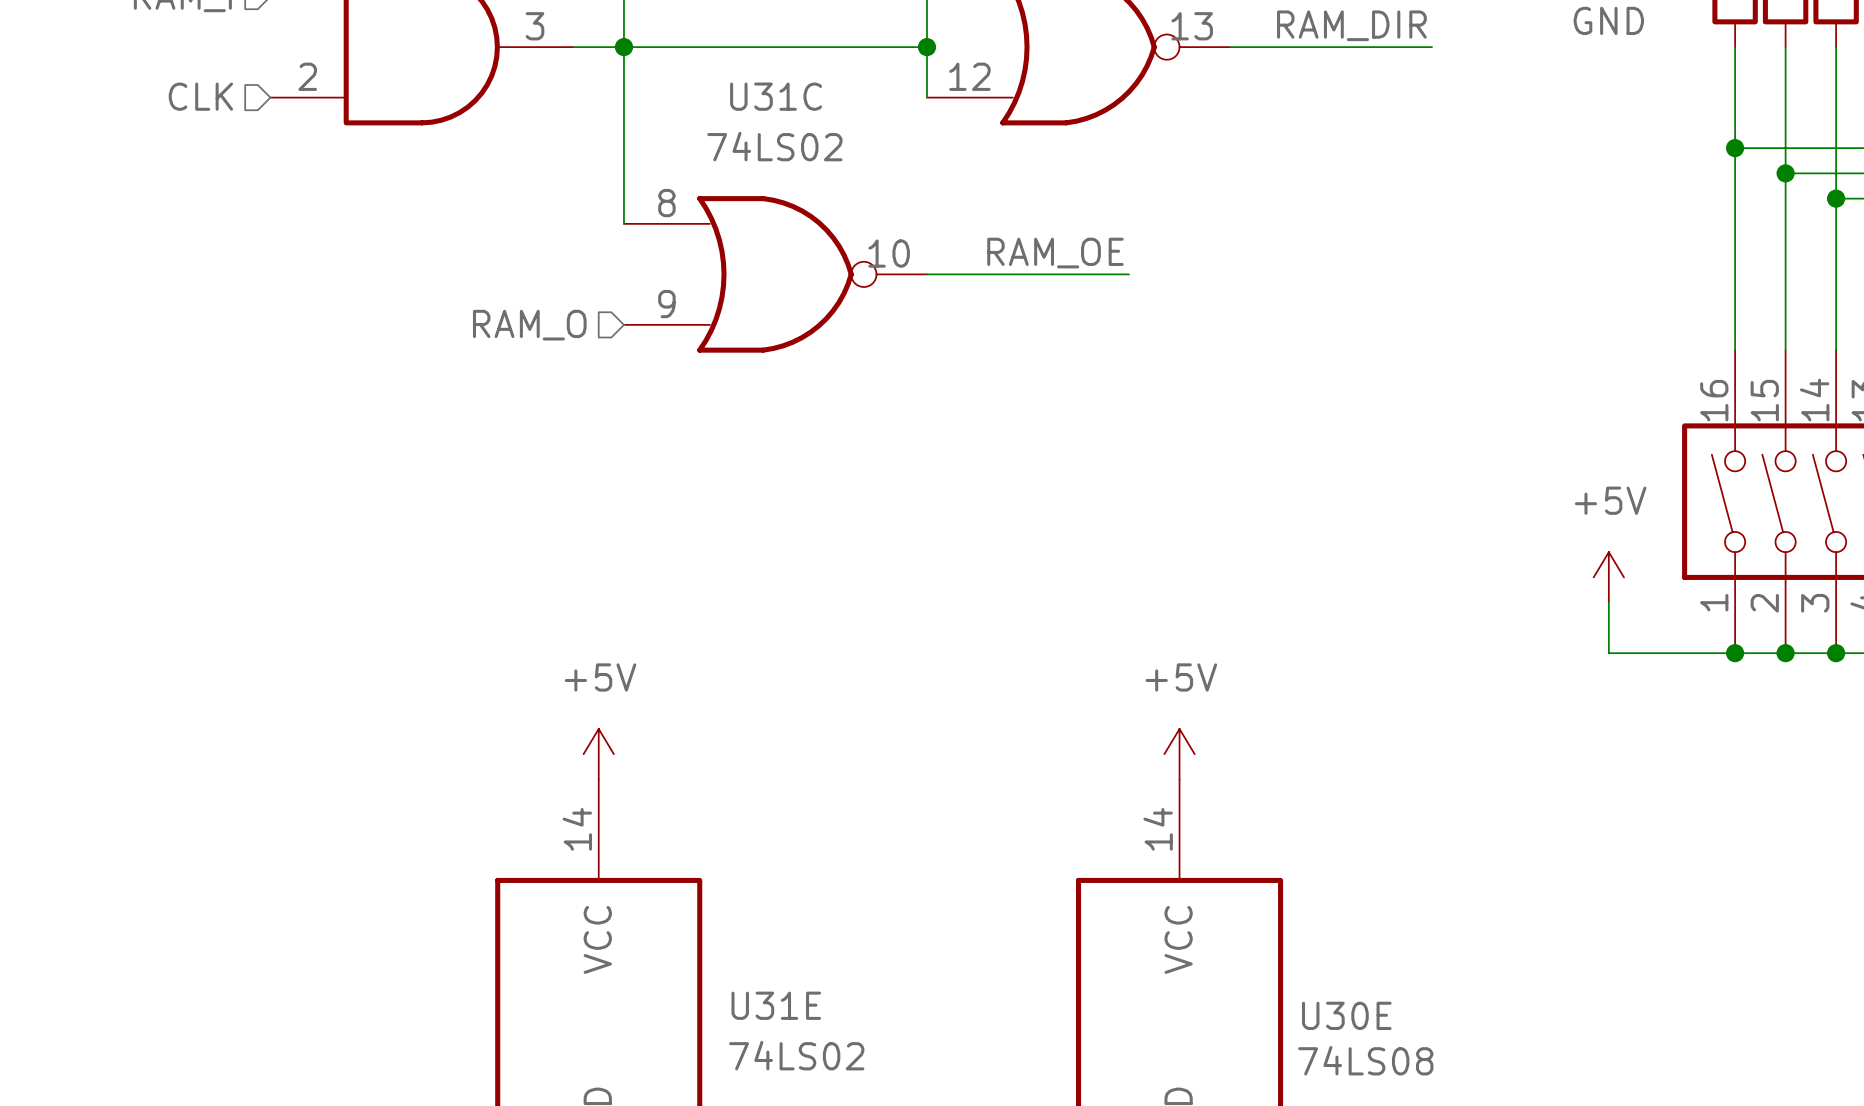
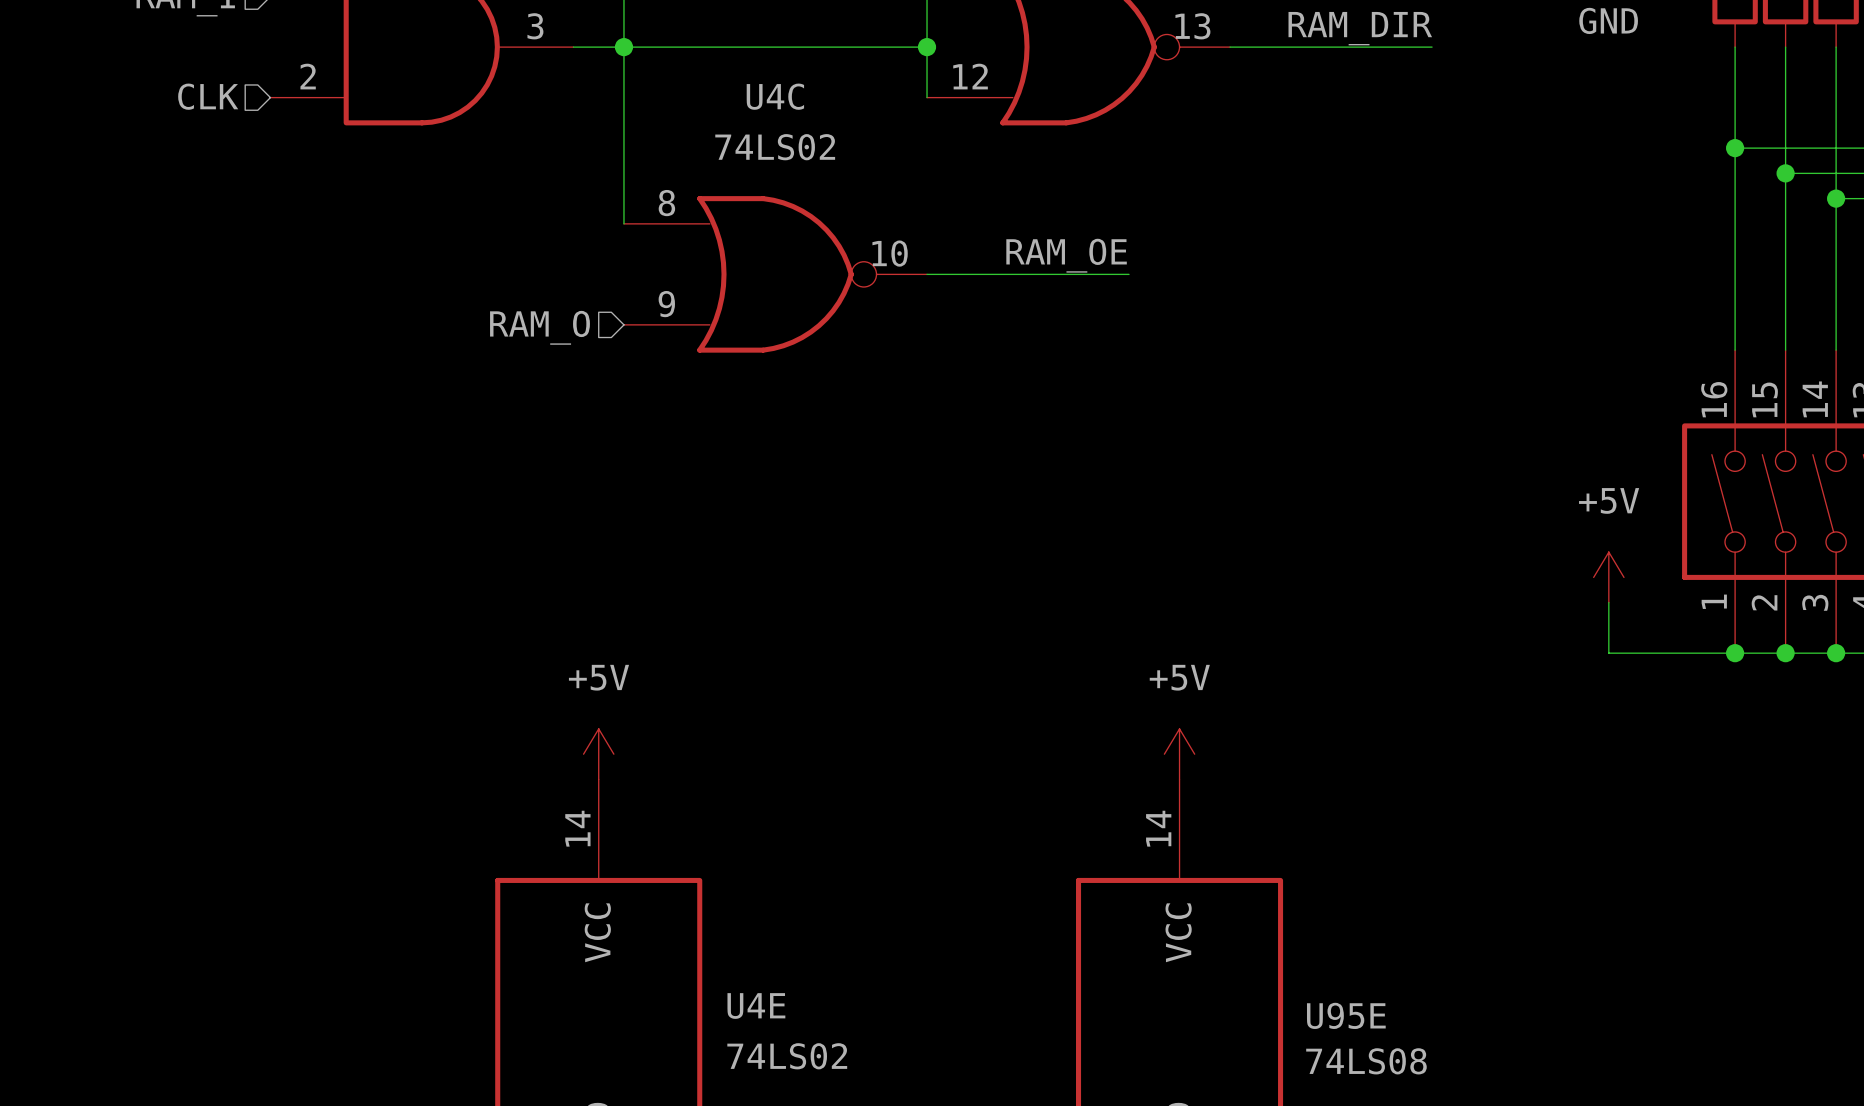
U31C name: U31C (776, 96) -> U4C (775, 96)
U31E name: U31E (776, 1005) -> U4E (756, 1006)
U30E name: U30E (1346, 1015) -> U95E (1346, 1015)

